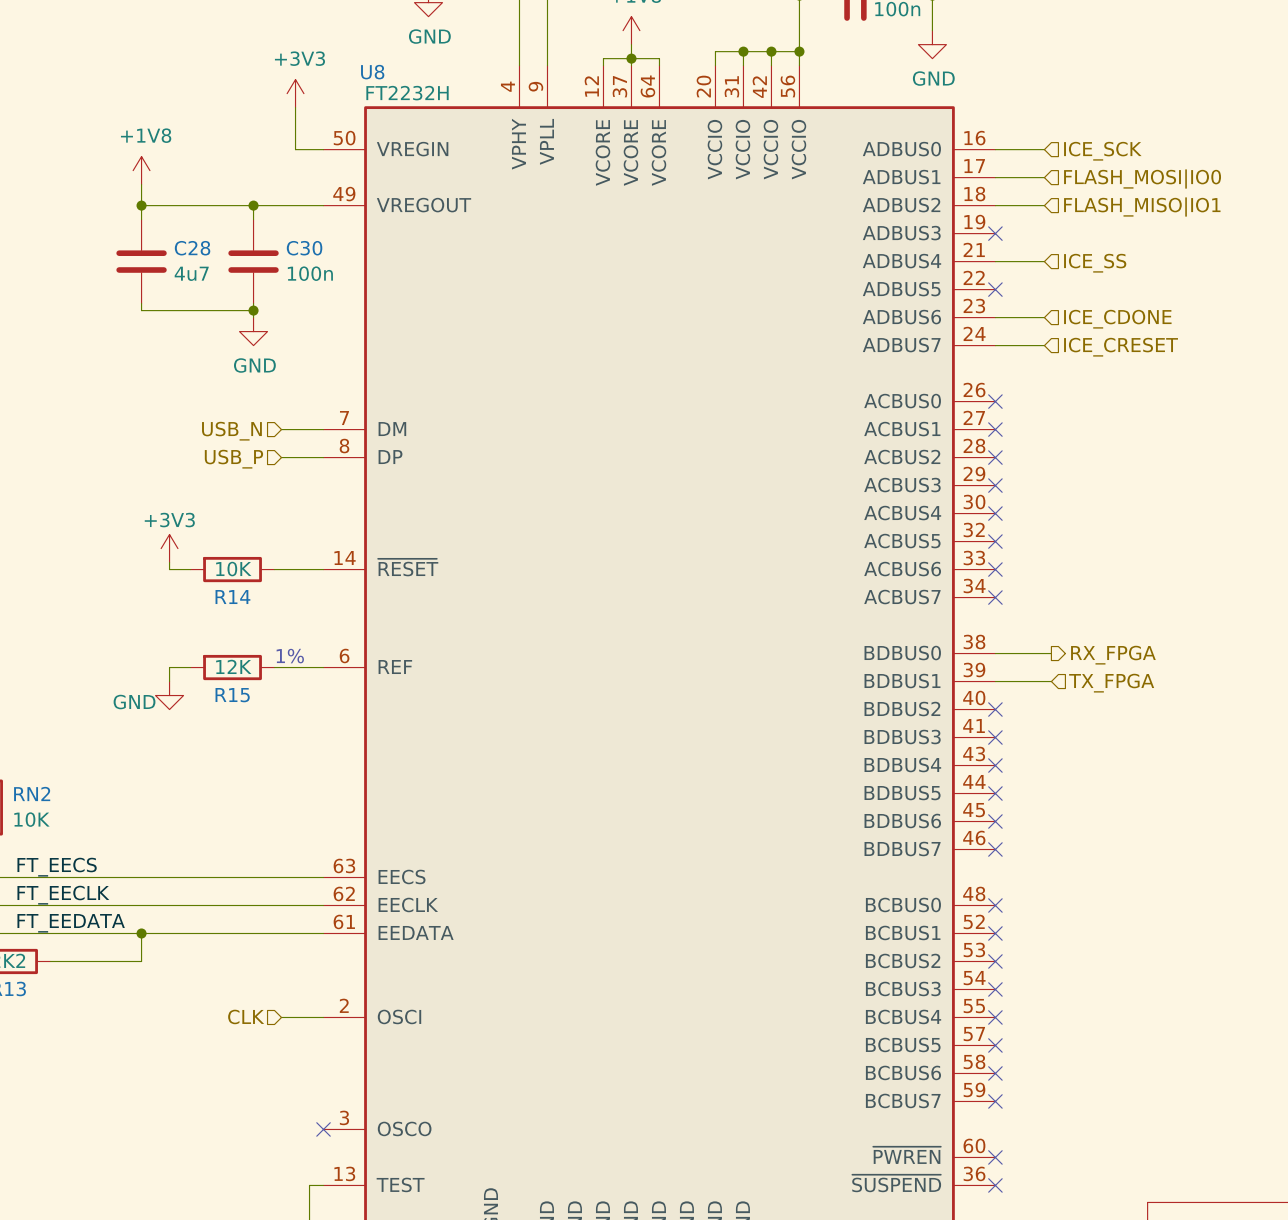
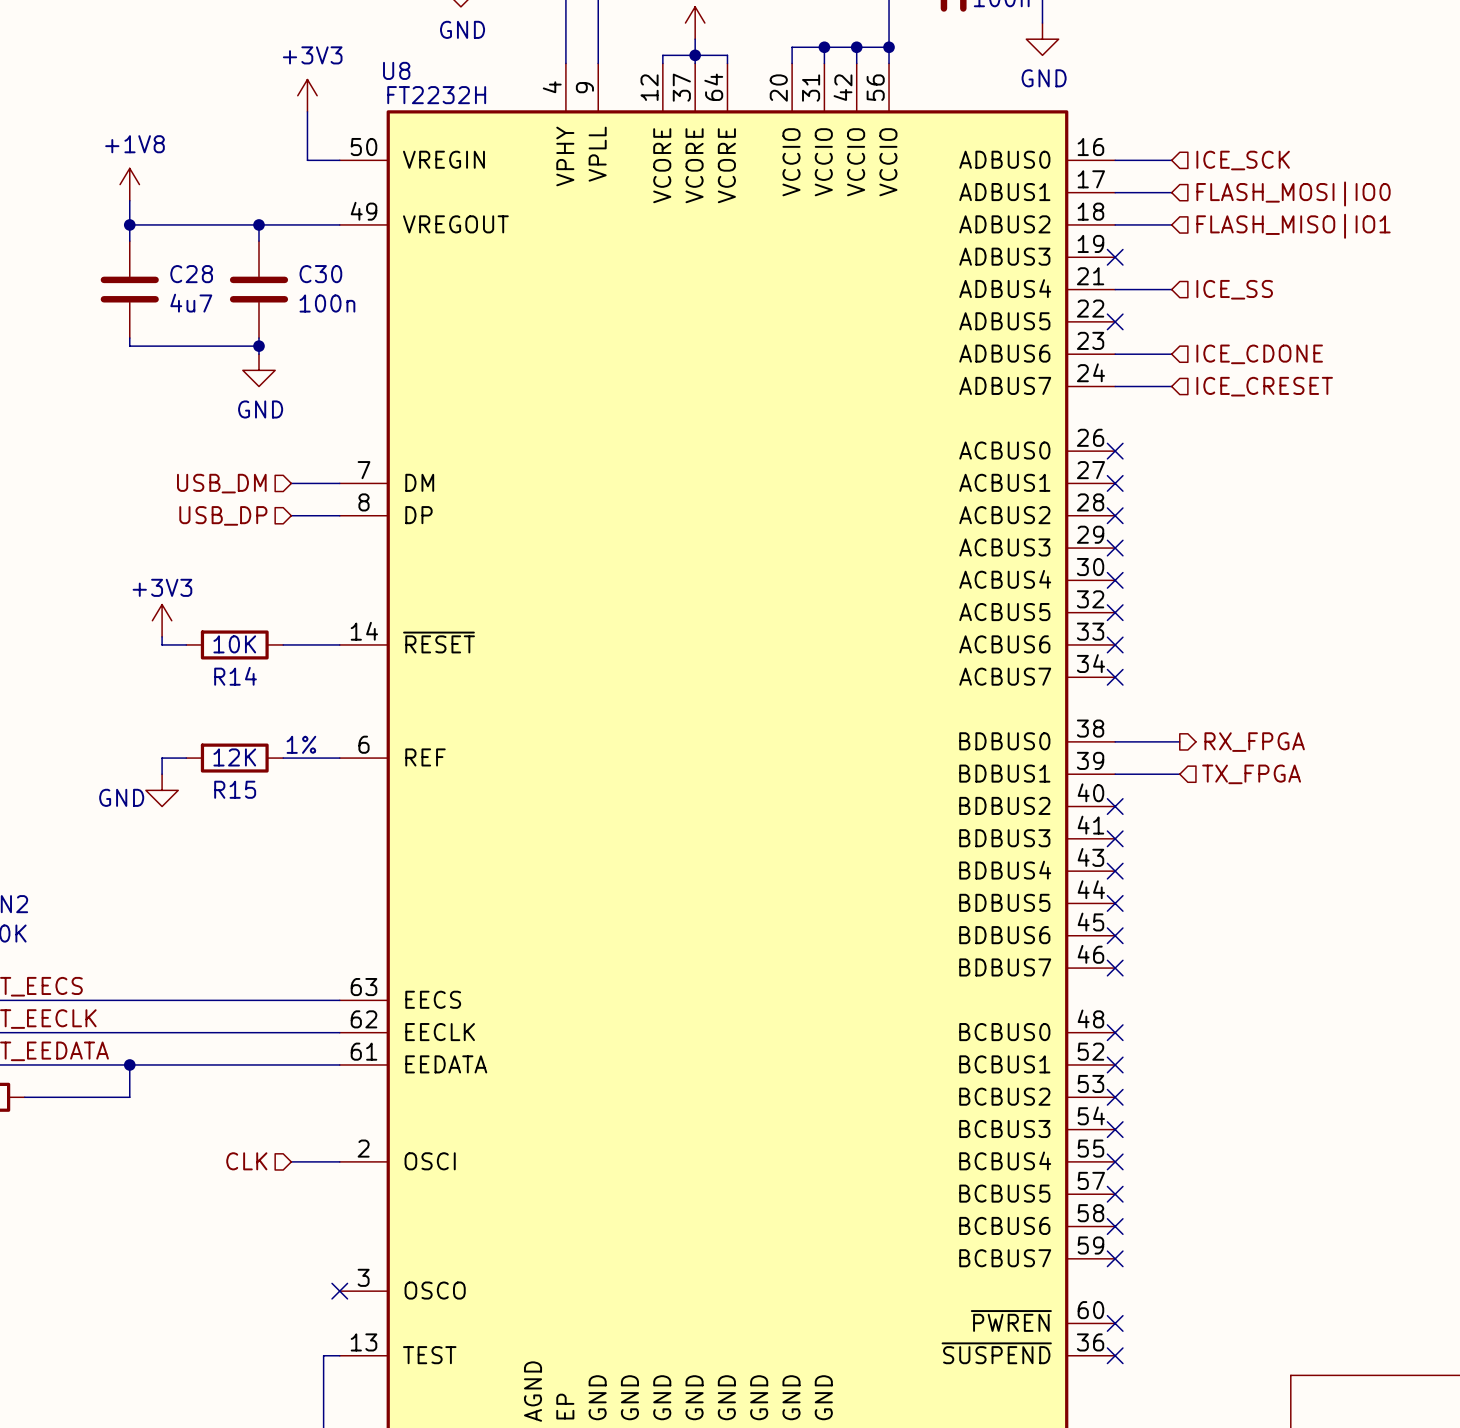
hierarchical label: USB_N (231, 431) -> USB_DM (221, 483)
hierarchical label: USB_P (233, 459) -> USB_DP (223, 515)

